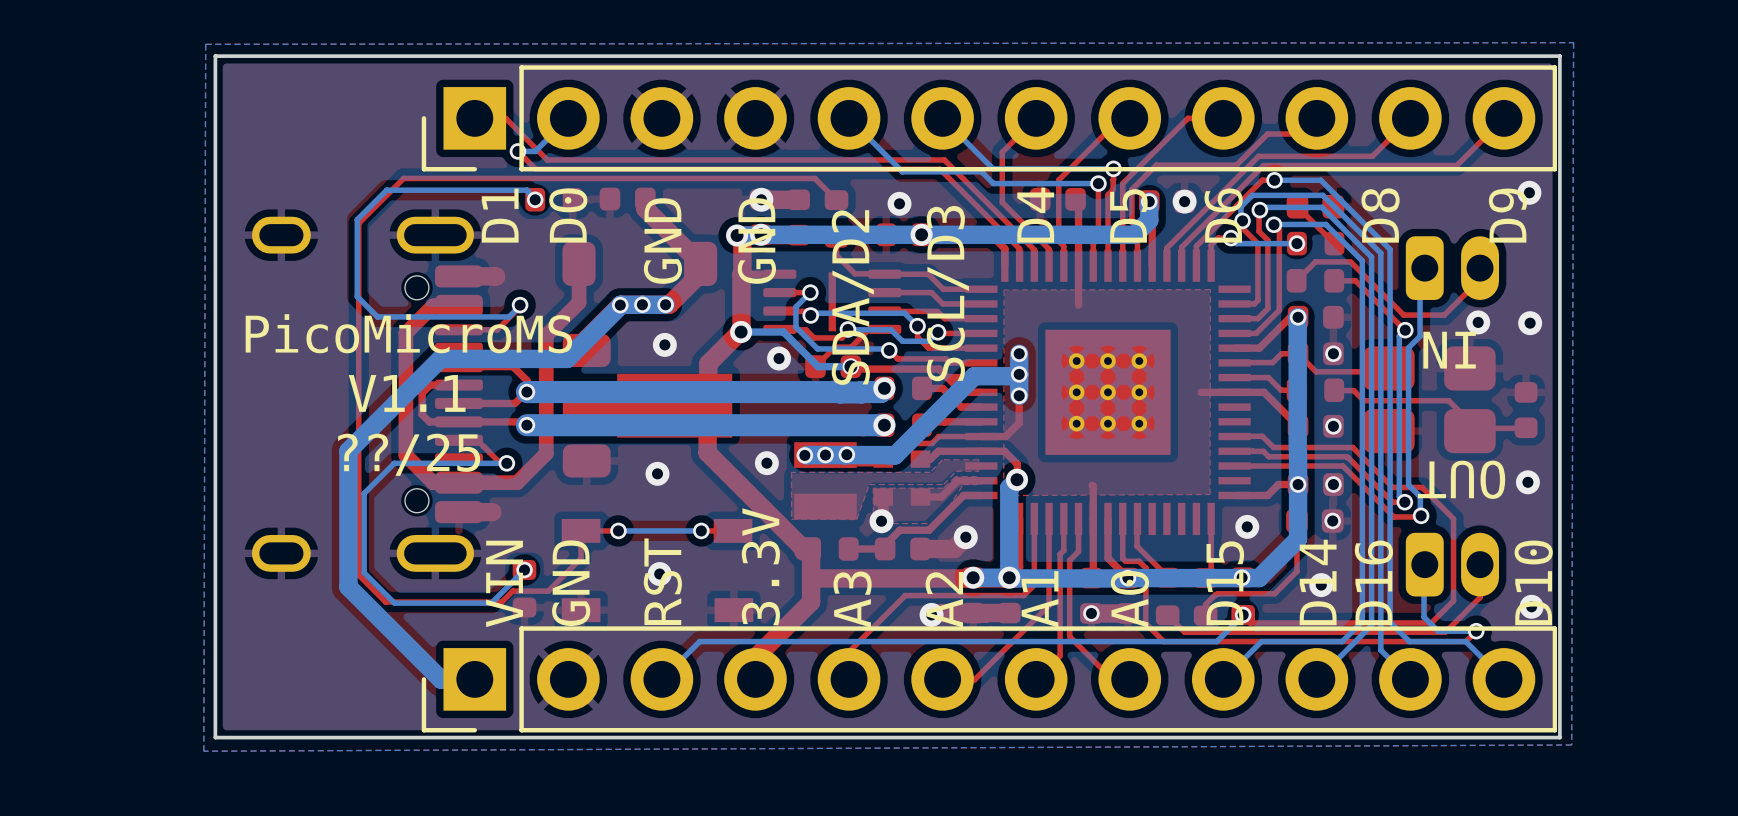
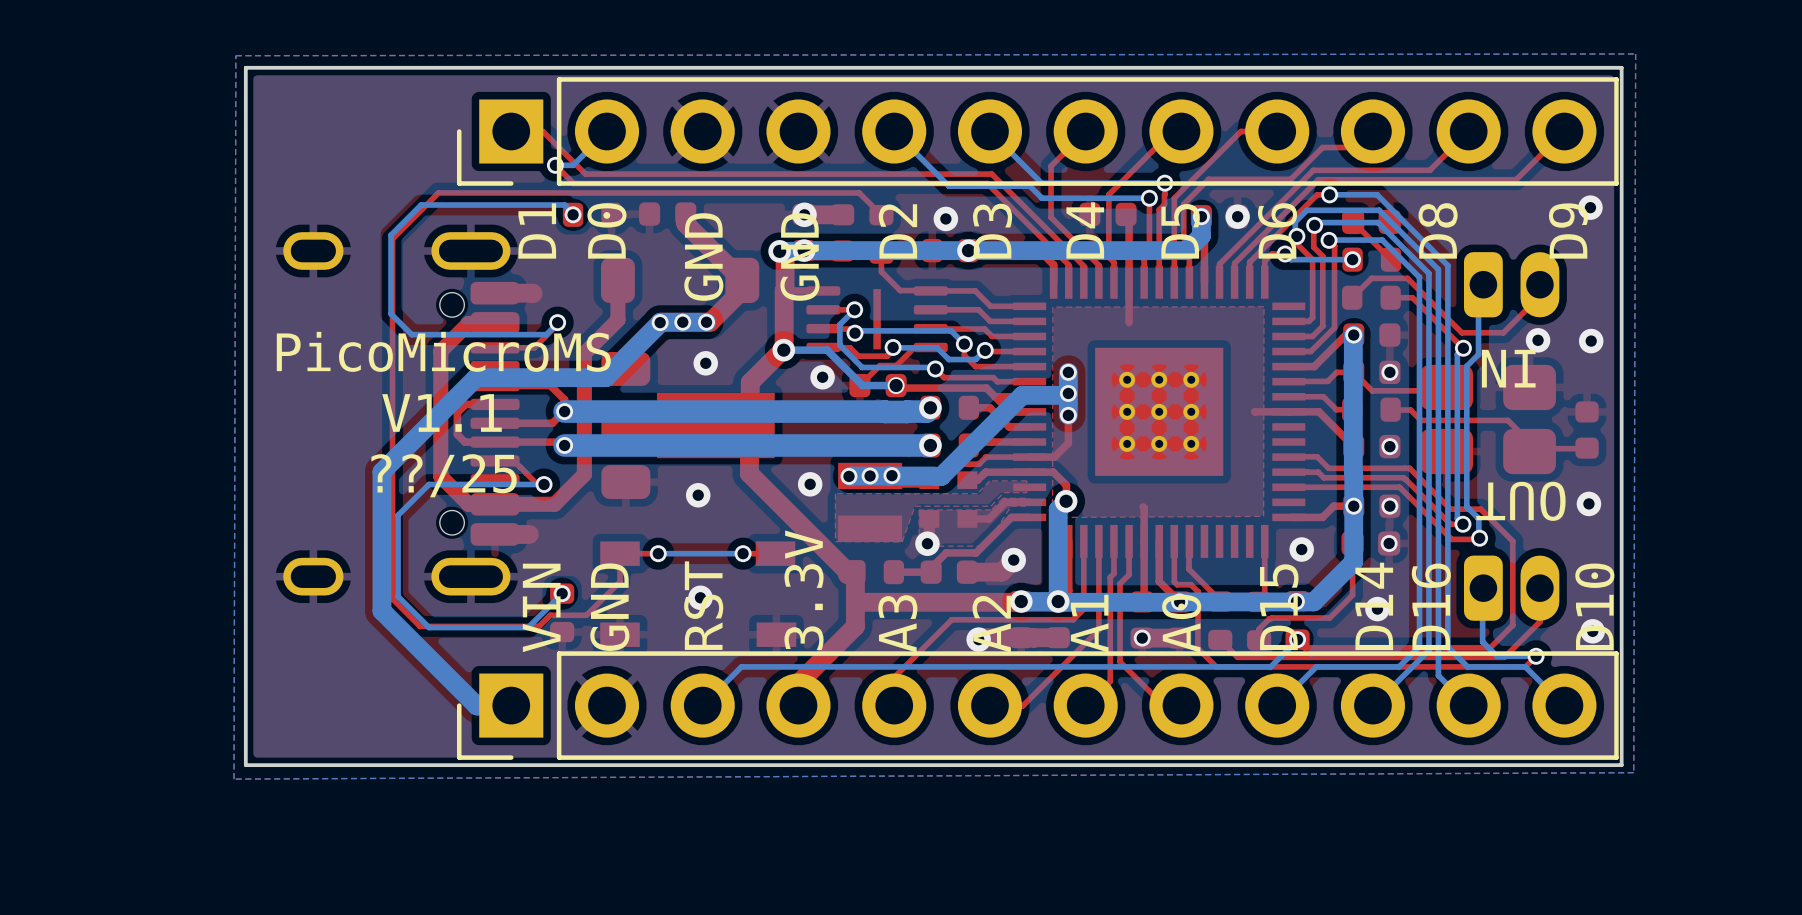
text: none -> D3 (992, 231)
text: none -> D2 (897, 231)
text: SCL/D3 (947, 293) -> none
text: SDA/D2 (852, 297) -> none

